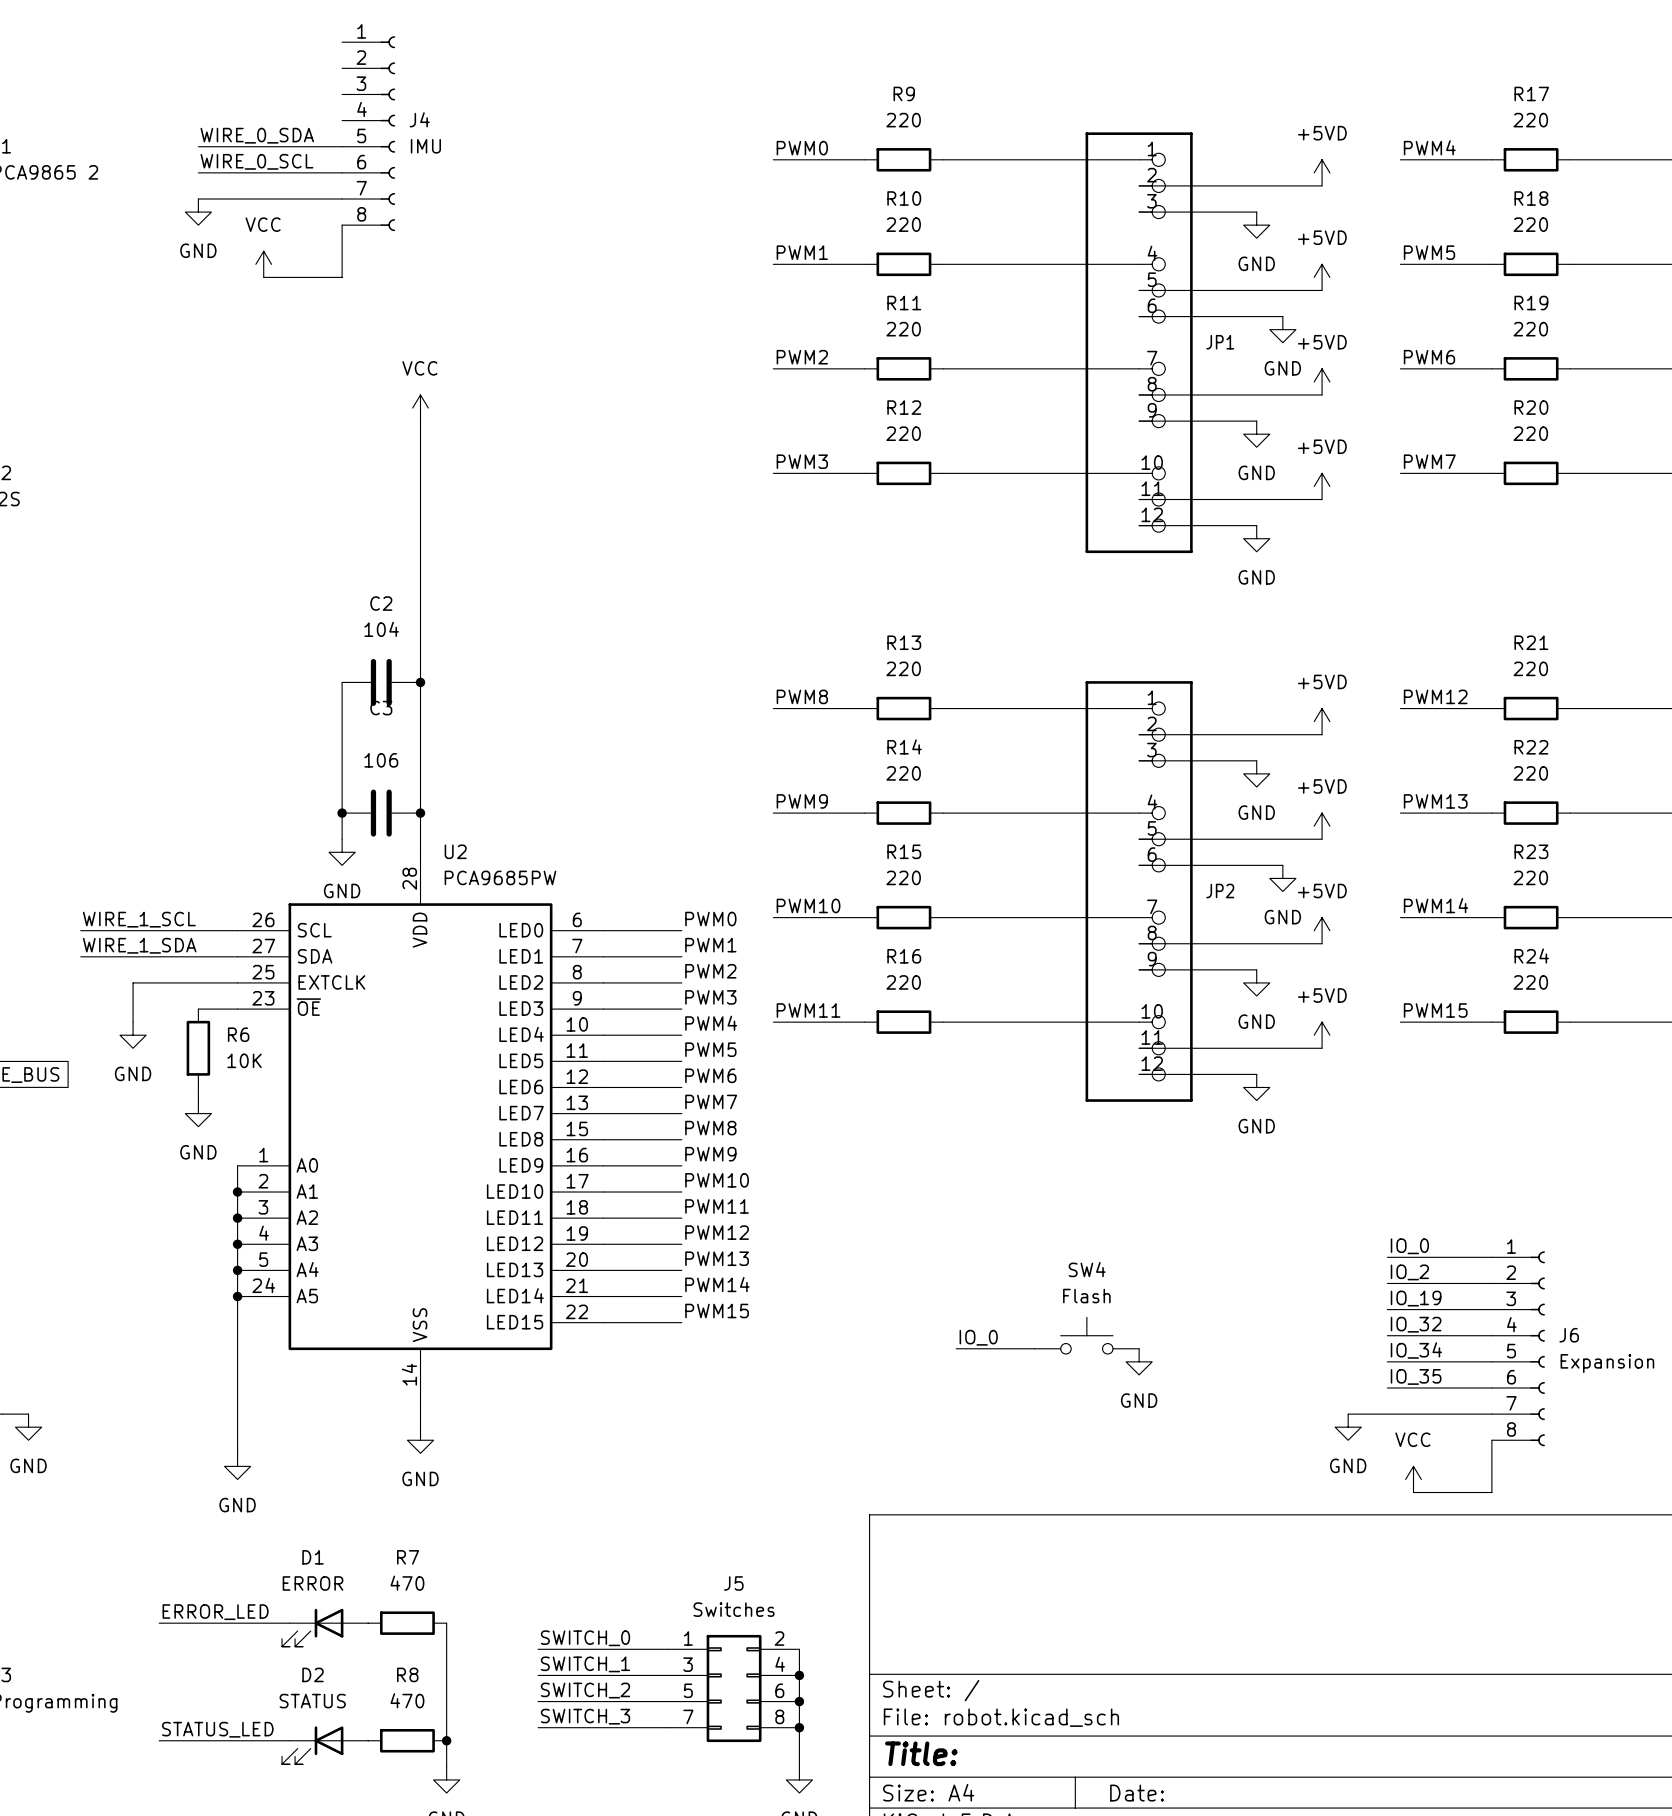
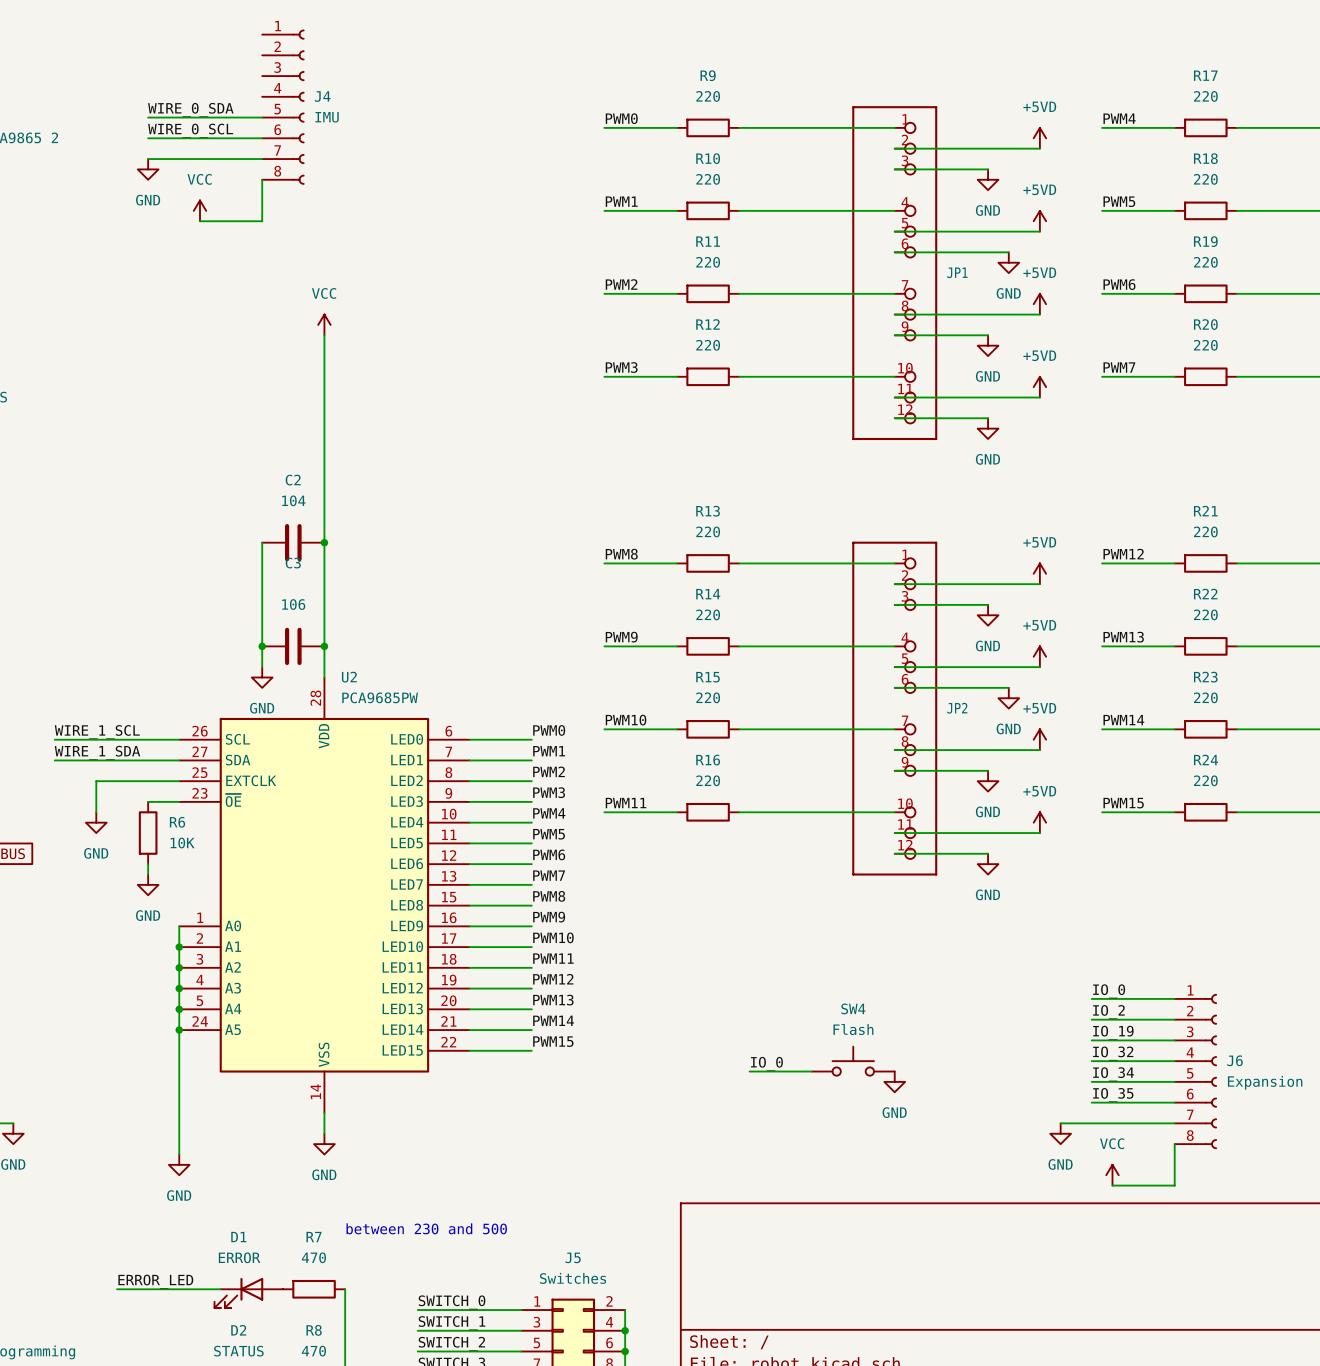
text: none -> between 230 and 500 (426, 1228)

